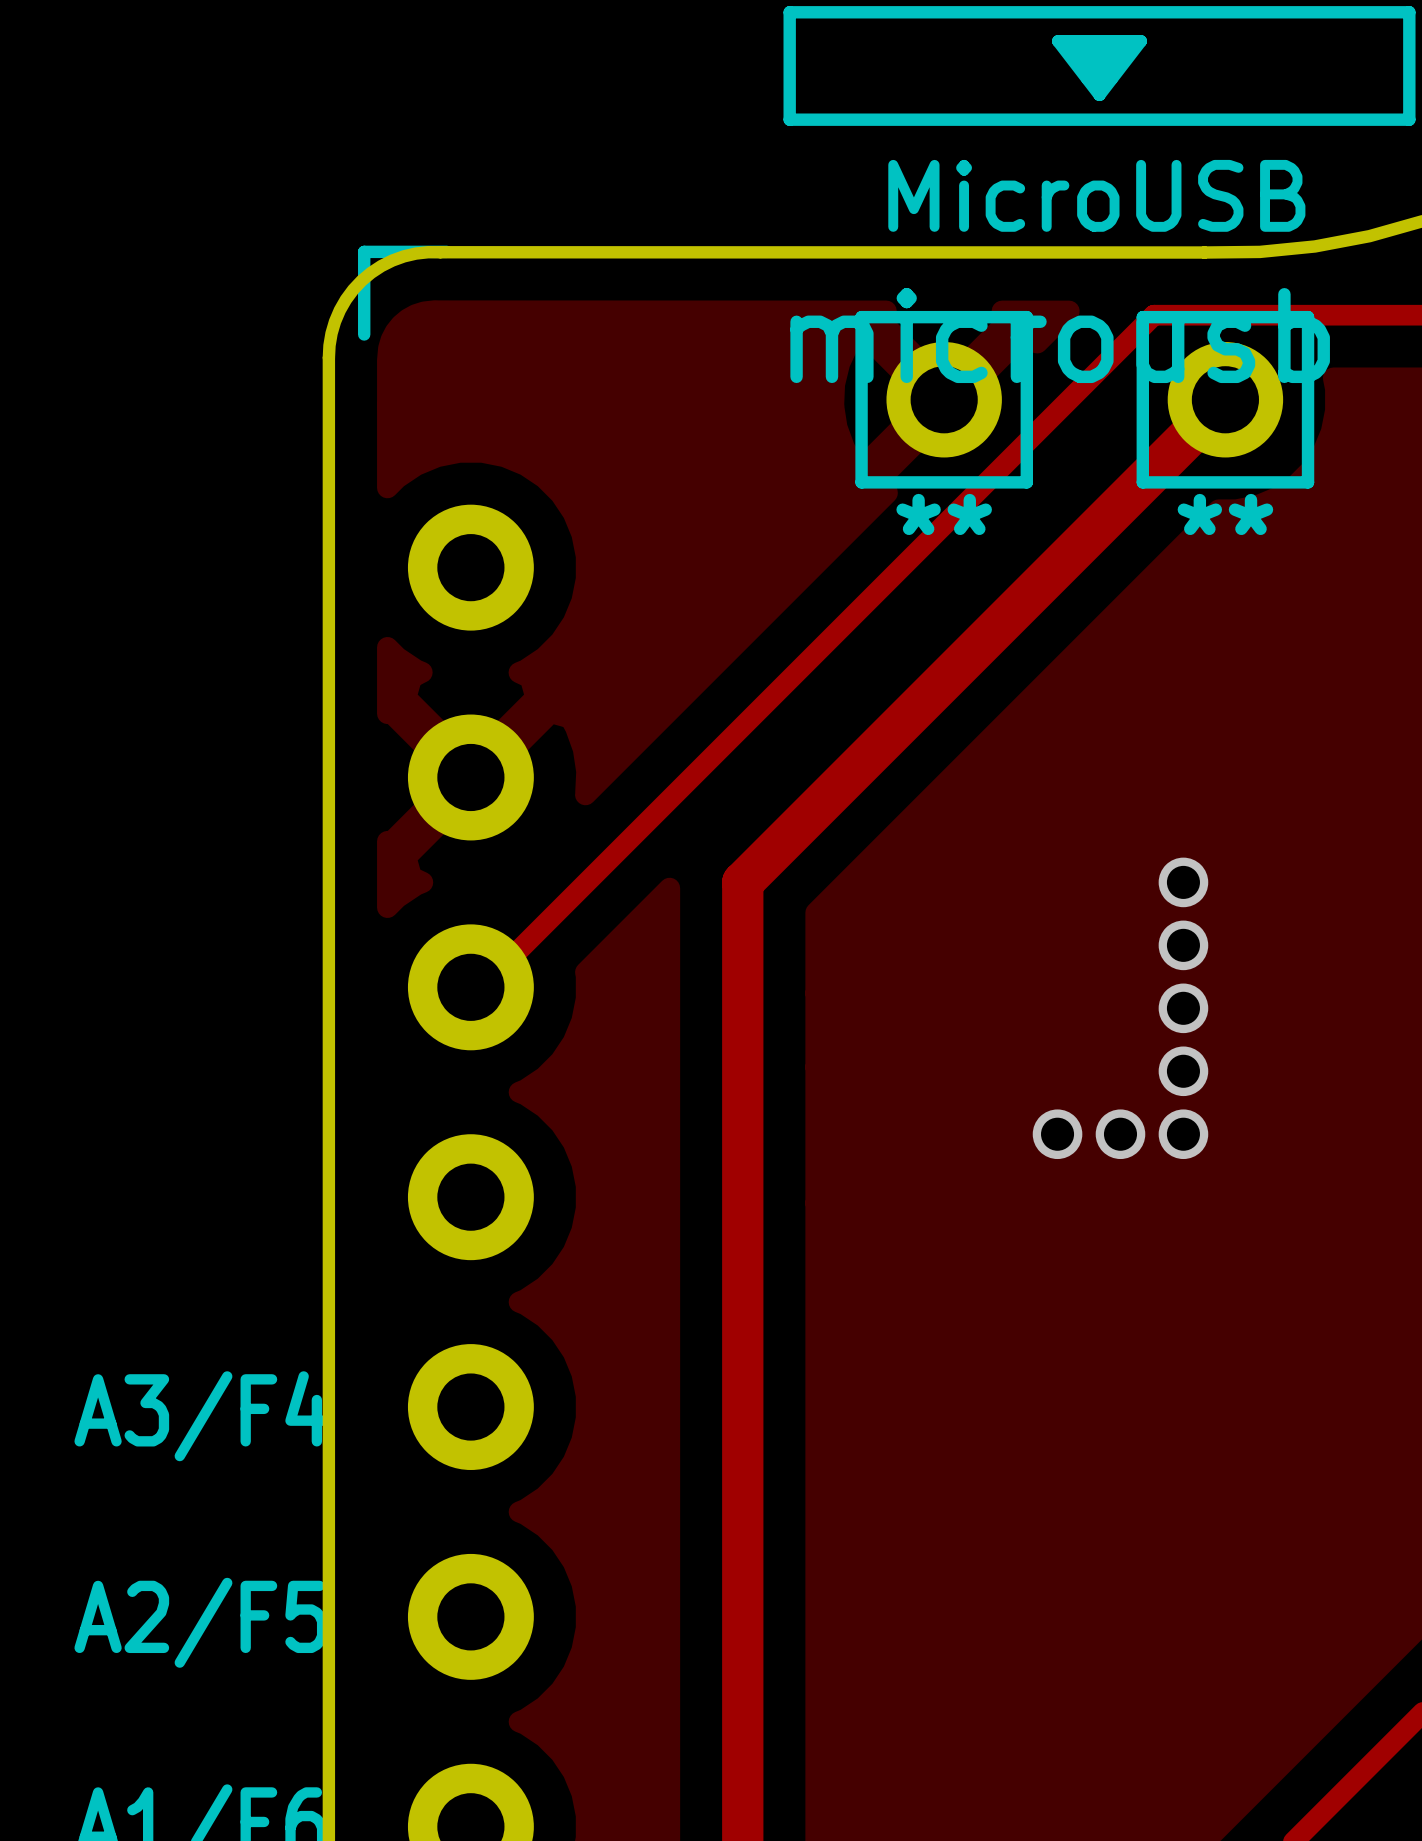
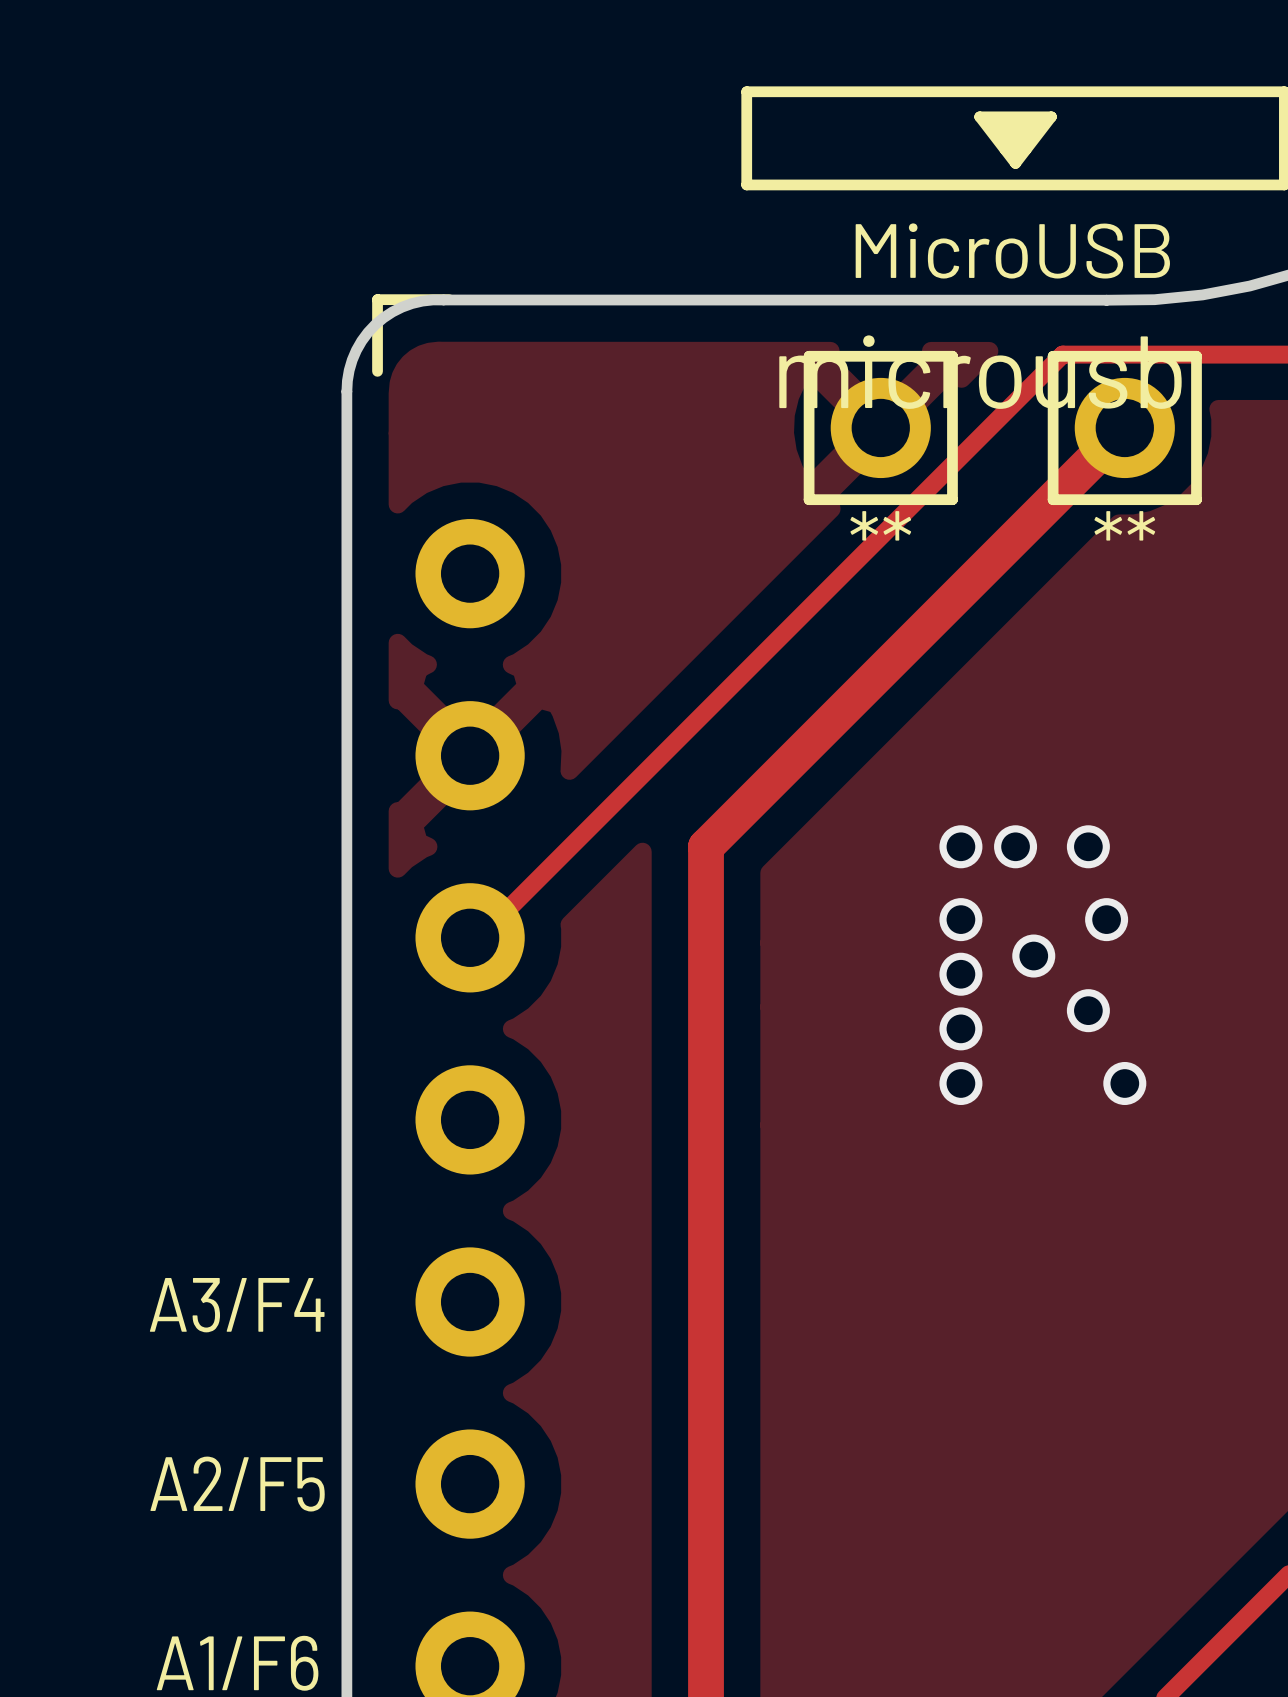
via: none -> (960, 846)
via: none -> (1015, 846)
via: (1183, 945) -> none
via: none -> (960, 919)
via: none -> (1106, 919)
via: none -> (1033, 956)
via: (1183, 1008) -> none
via: none -> (960, 974)
via: none -> (960, 1028)
via: (1057, 1134) -> none
via: (1120, 1134) -> none
via position: (1183, 1134) -> (1124, 1083)
via: none -> (960, 1083)

